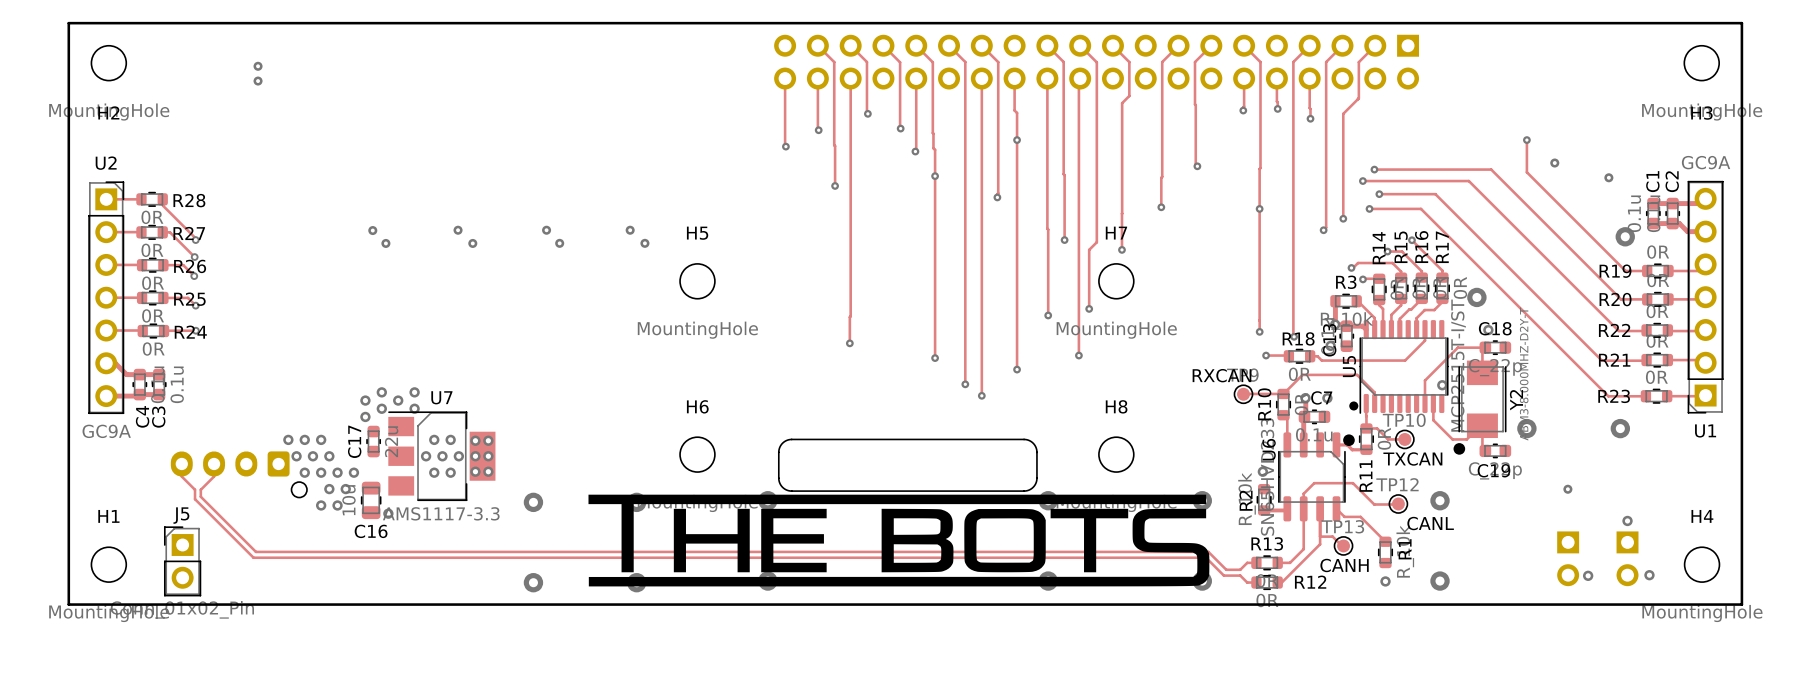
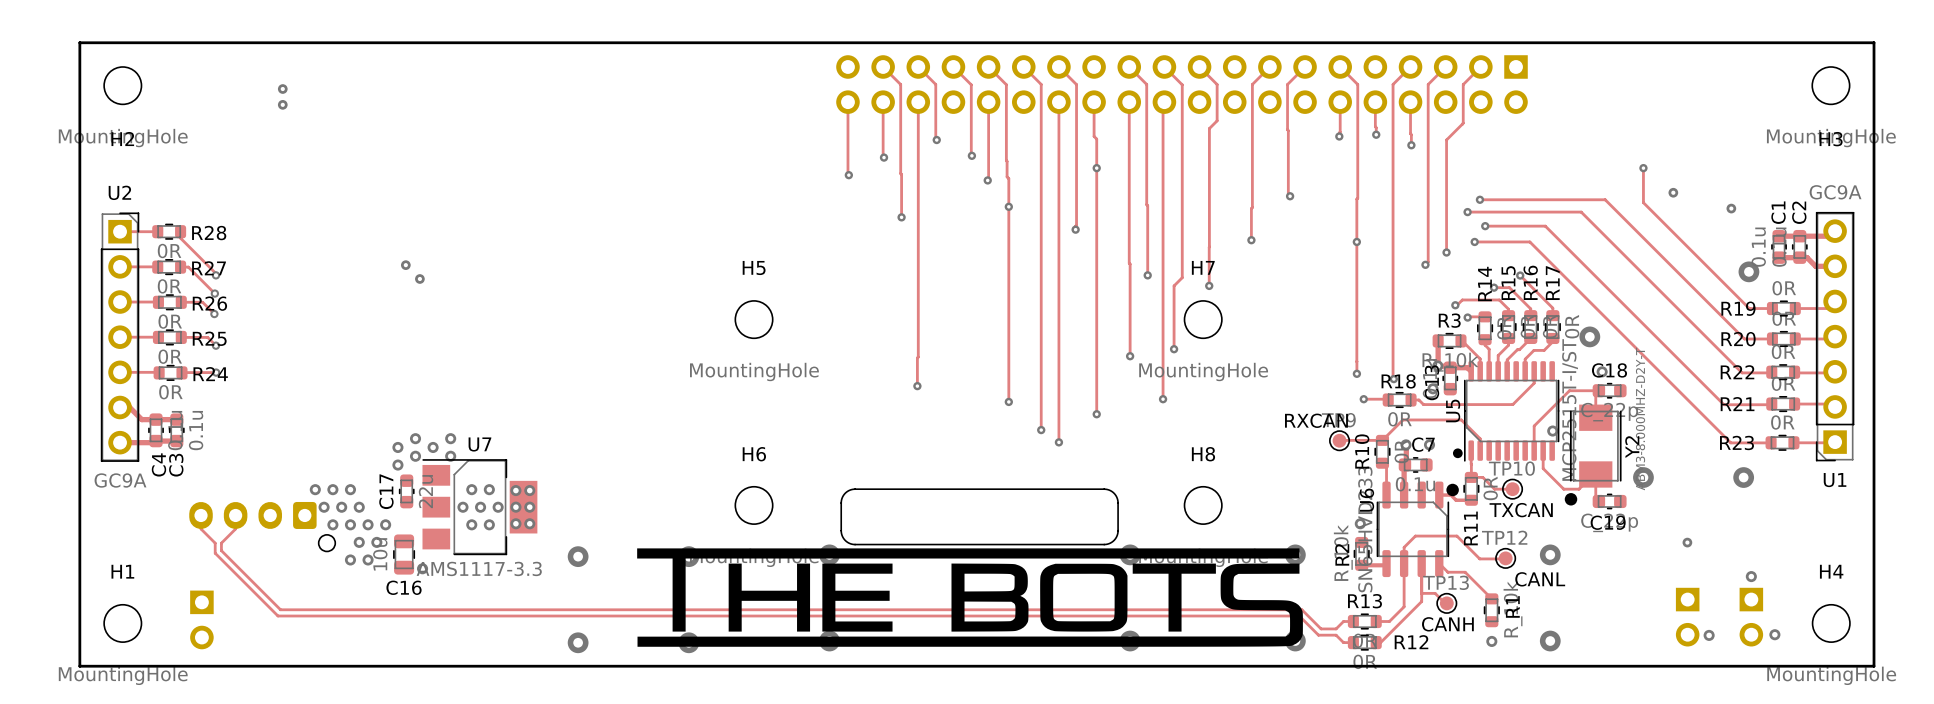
via: (458, 230) -> none
via: (546, 230) -> none
via: (630, 230) -> none
via: (472, 243) -> none
via: (559, 243) -> none
via: (644, 243) -> none
J5 side: top (182, 561) -> bottom (201, 619)

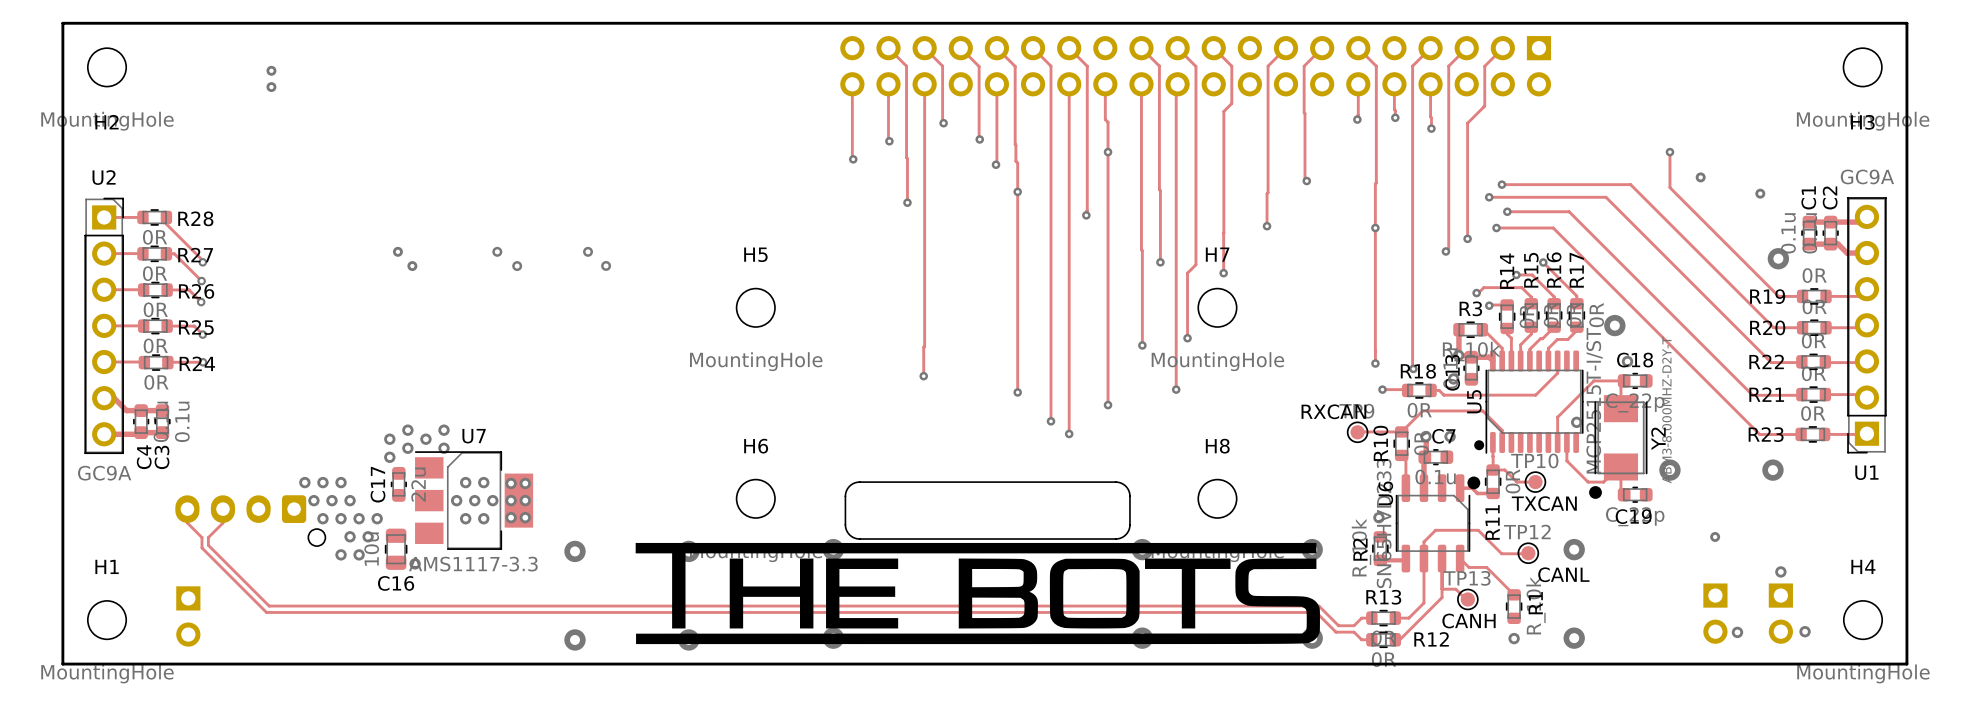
via: none -> (497, 251)
via: none -> (588, 251)
via: none -> (606, 265)
via: none -> (517, 266)

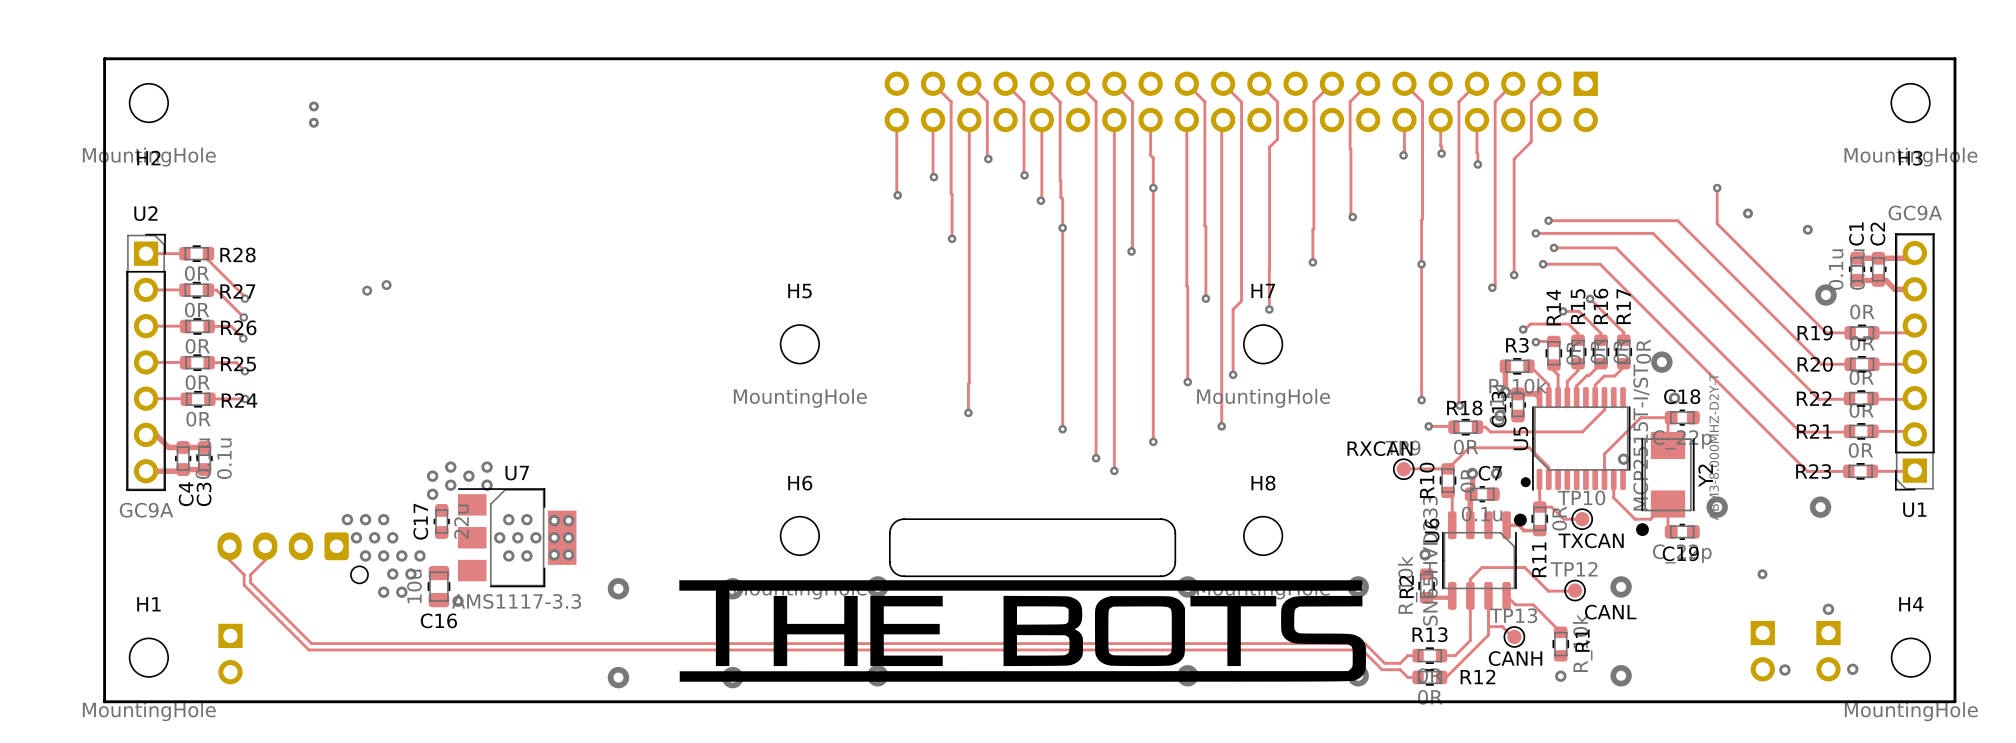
via: none -> (386, 285)
via: (397, 251) -> none
via: (497, 251) -> none
via: (588, 251) -> none
via: none -> (367, 290)
via: (606, 265) -> none
via: (412, 266) -> none
via: (517, 266) -> none

